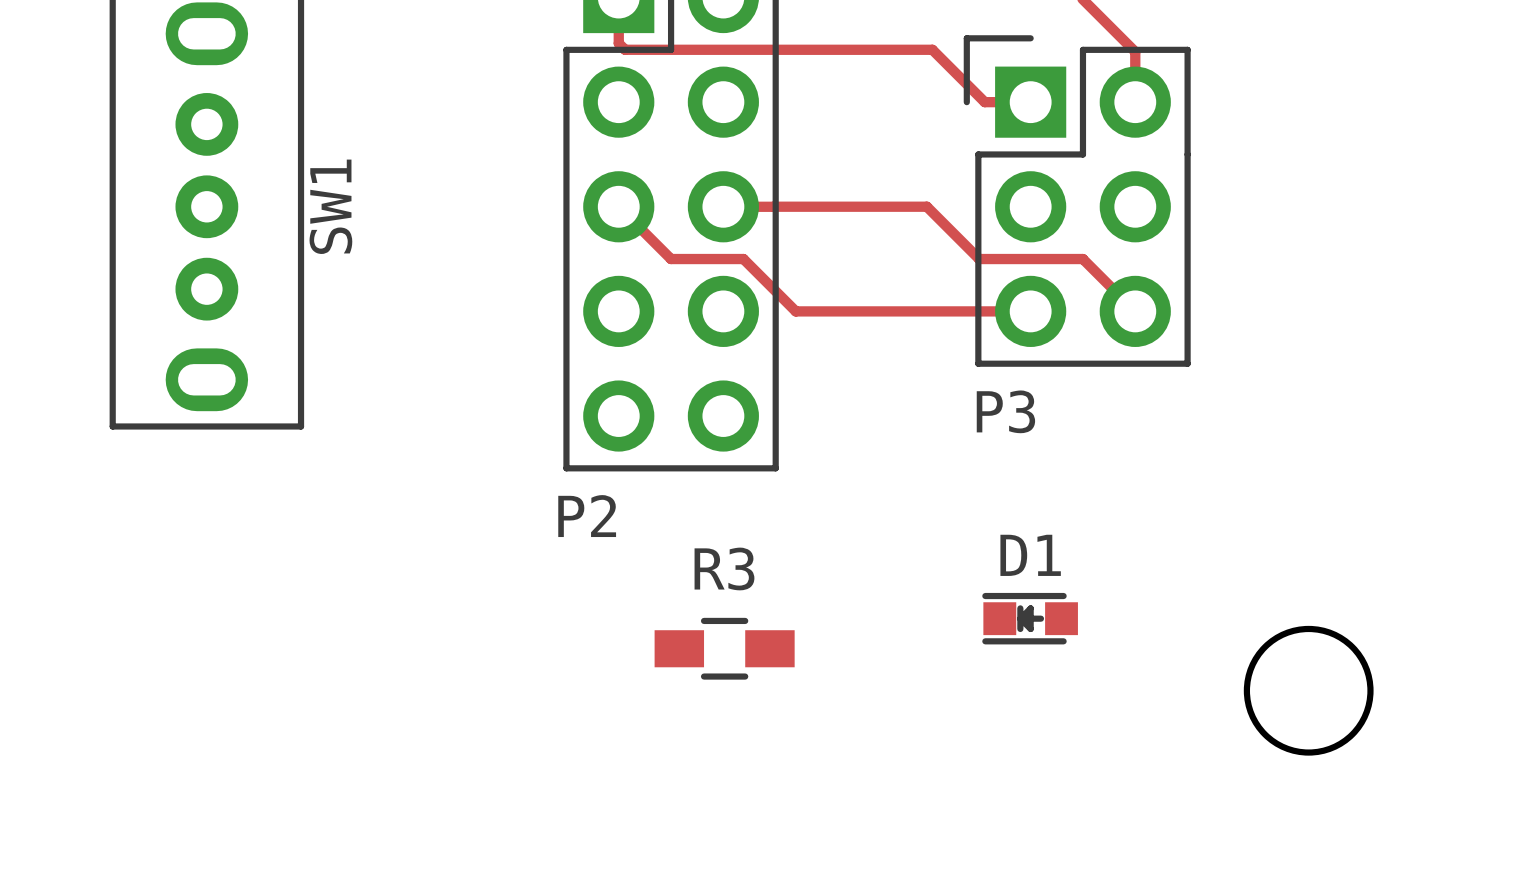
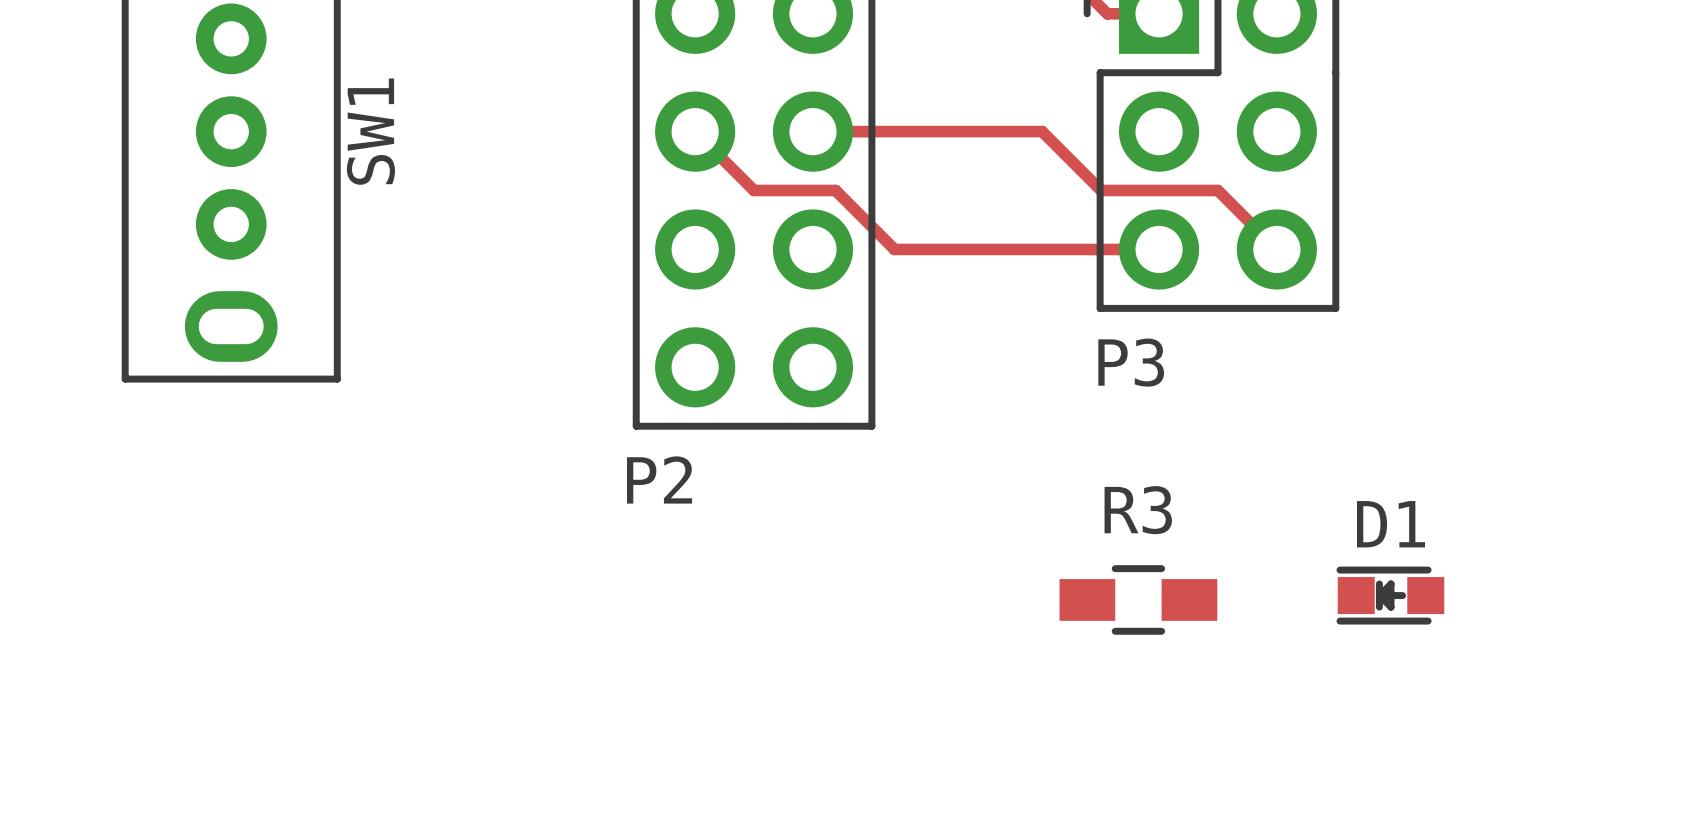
D1 position: (1030, 618) -> (1390, 595)
round board edge: [1243, 625, 1374, 756] -> none
R3 position: (724, 648) -> (1138, 599)

